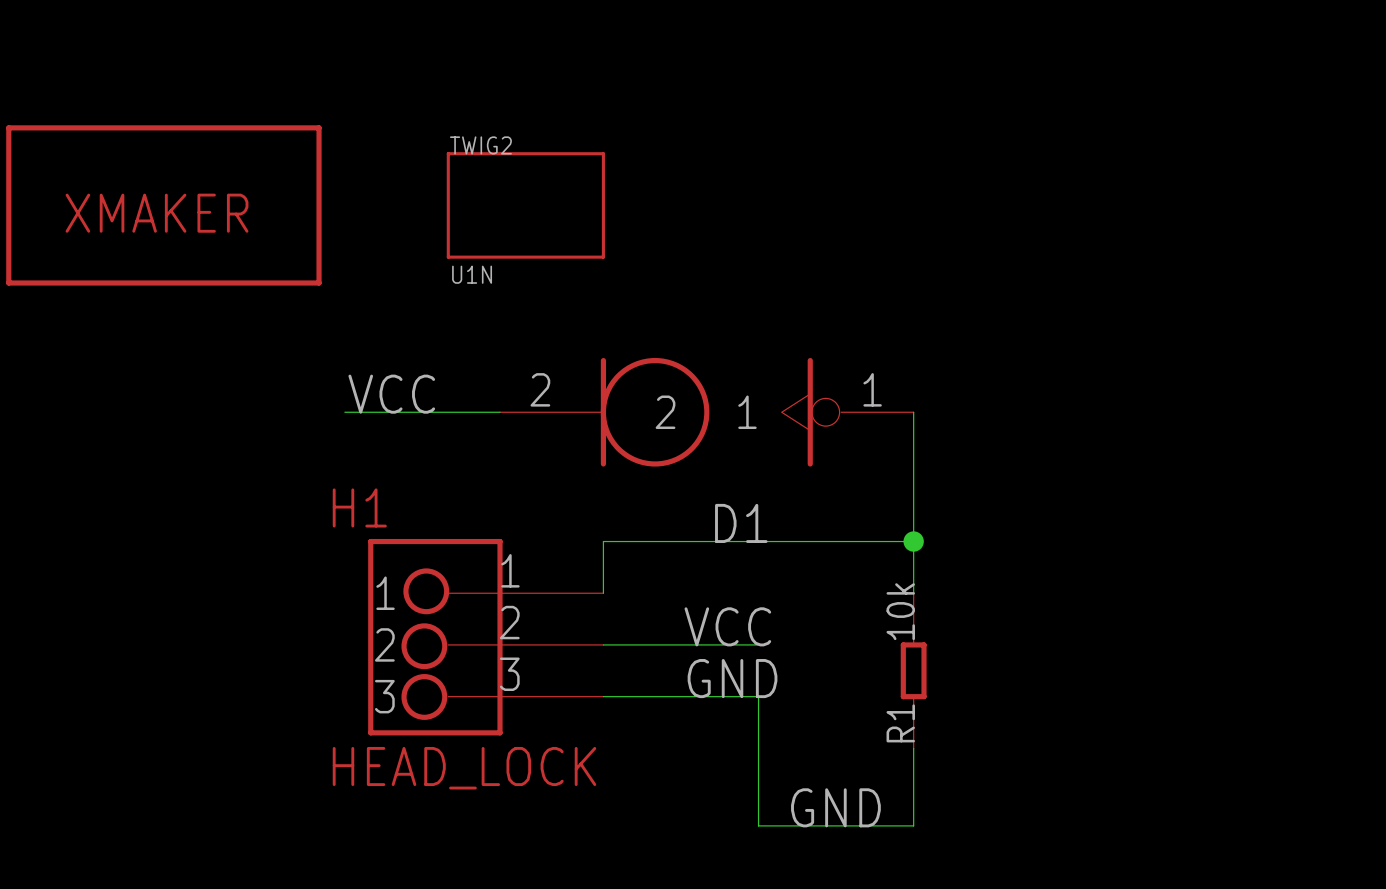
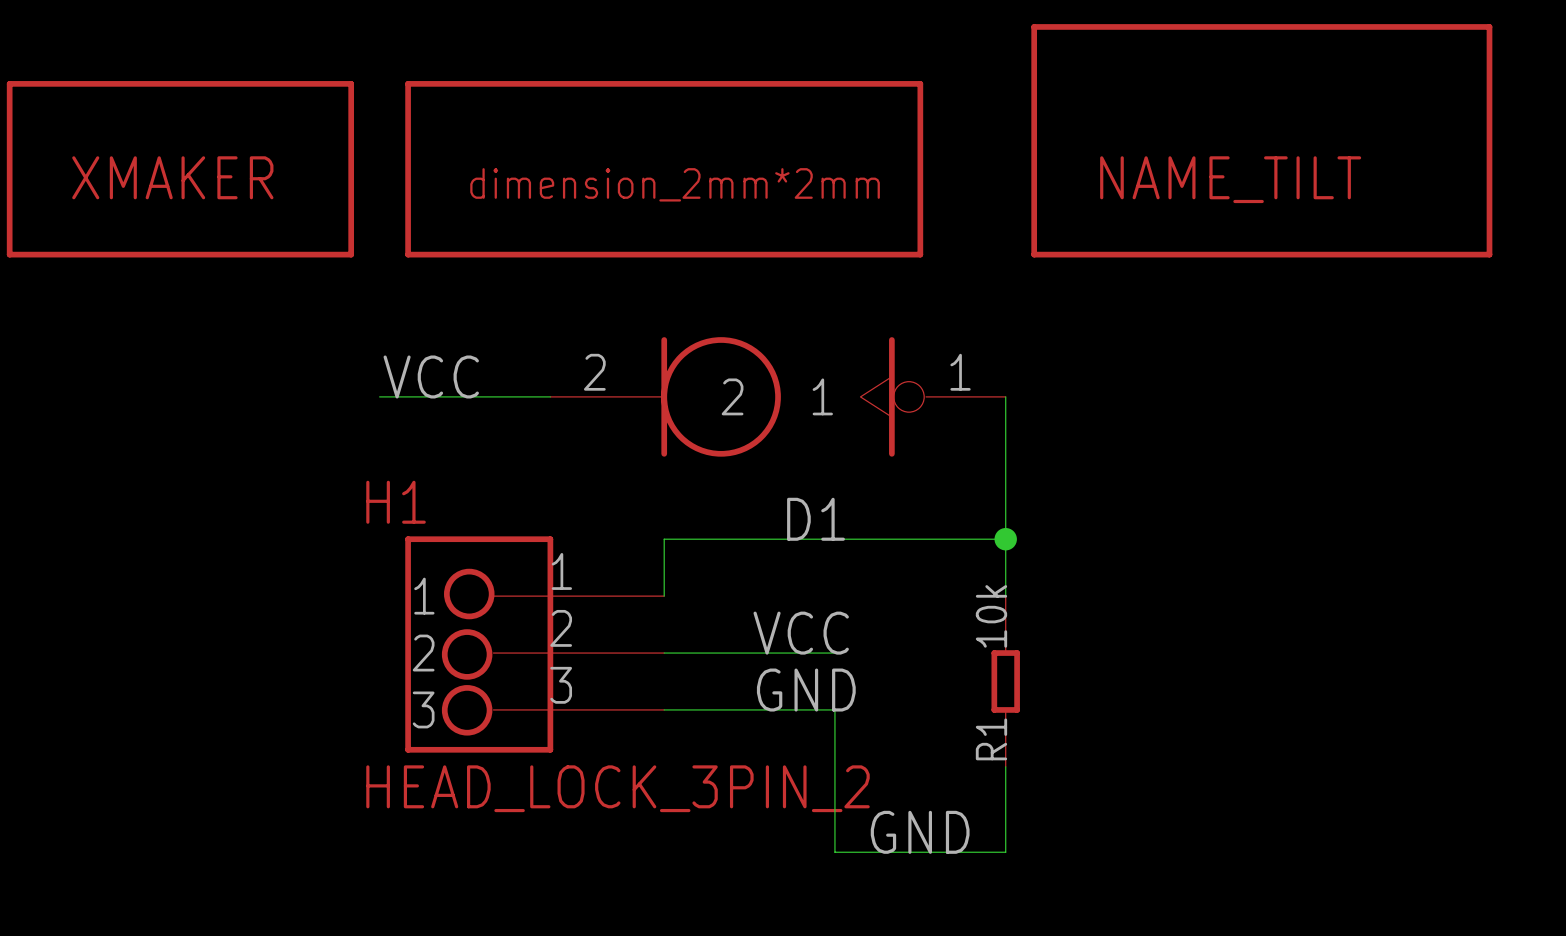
part: none -> (1261, 140)
TWIG2: U1N (525, 205) -> none
part: none -> (664, 169)
H1 value: HEAD_LOCK (464, 768) -> HEAD_LOCK_3PIN_2 (618, 788)

